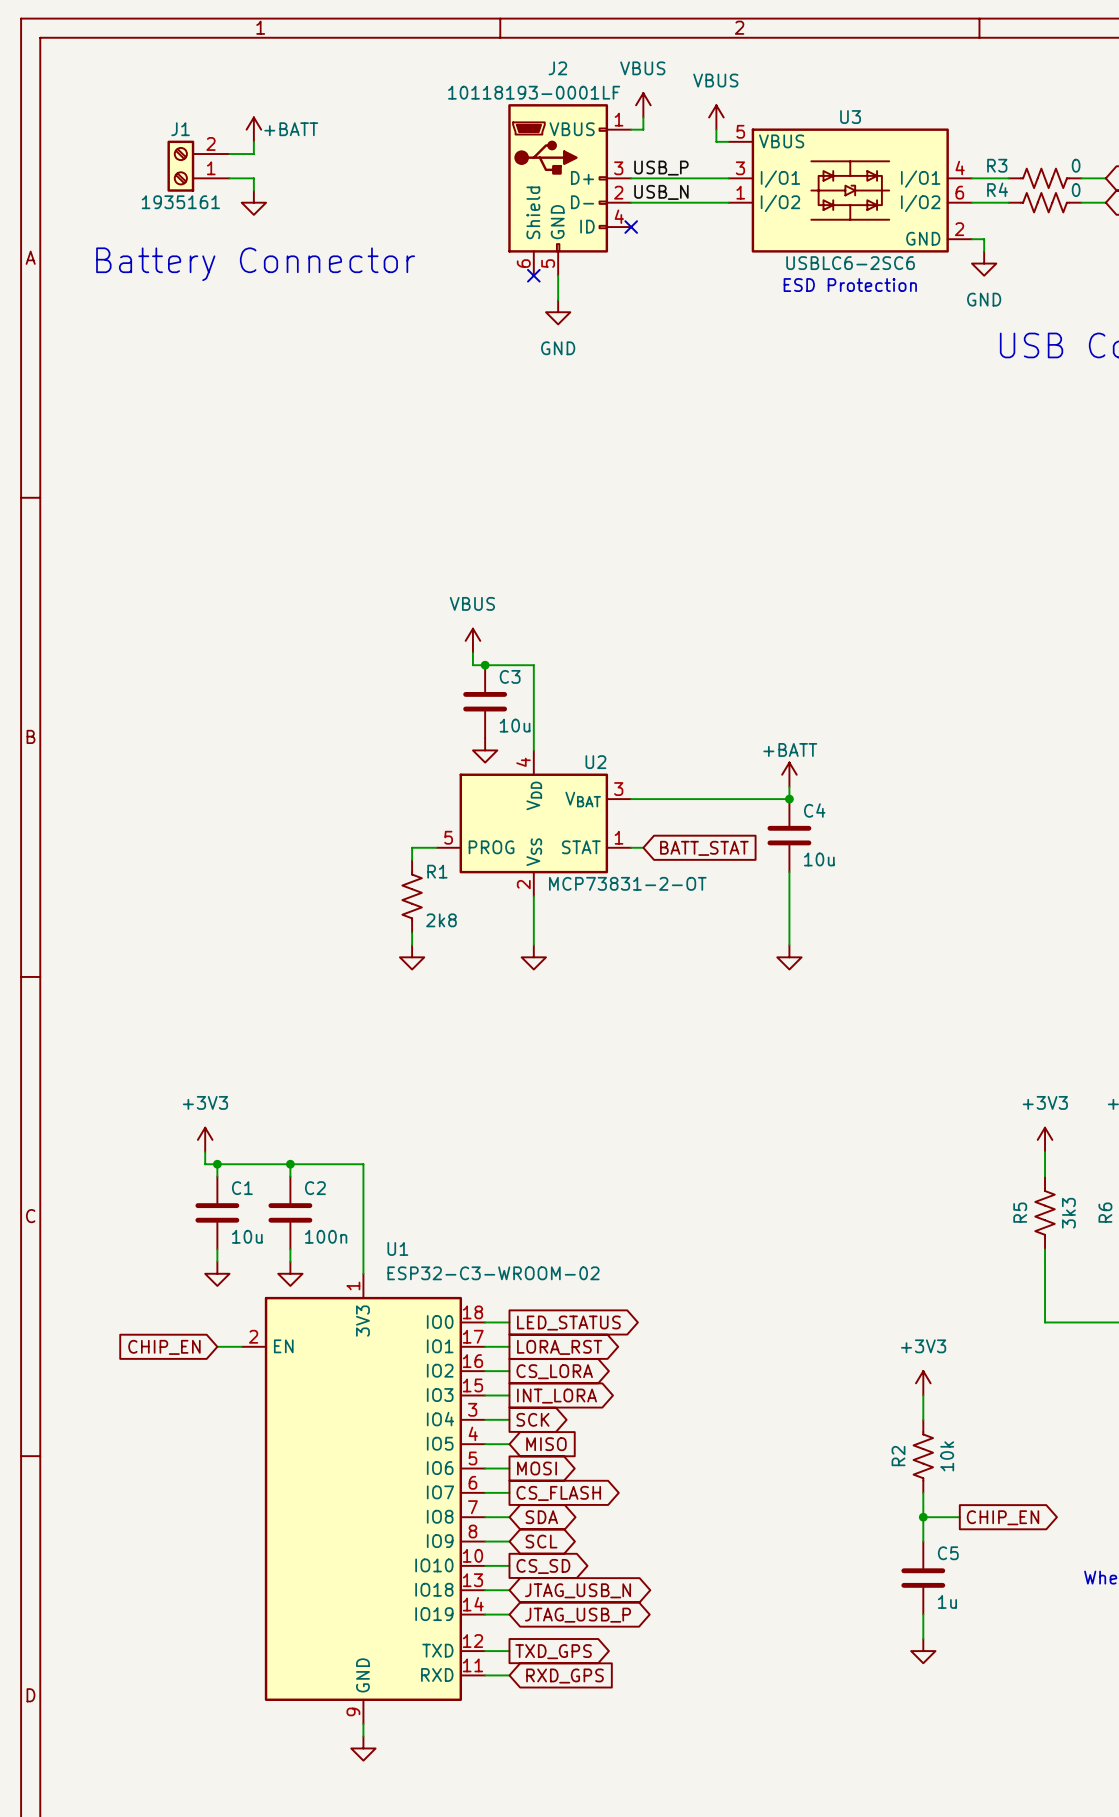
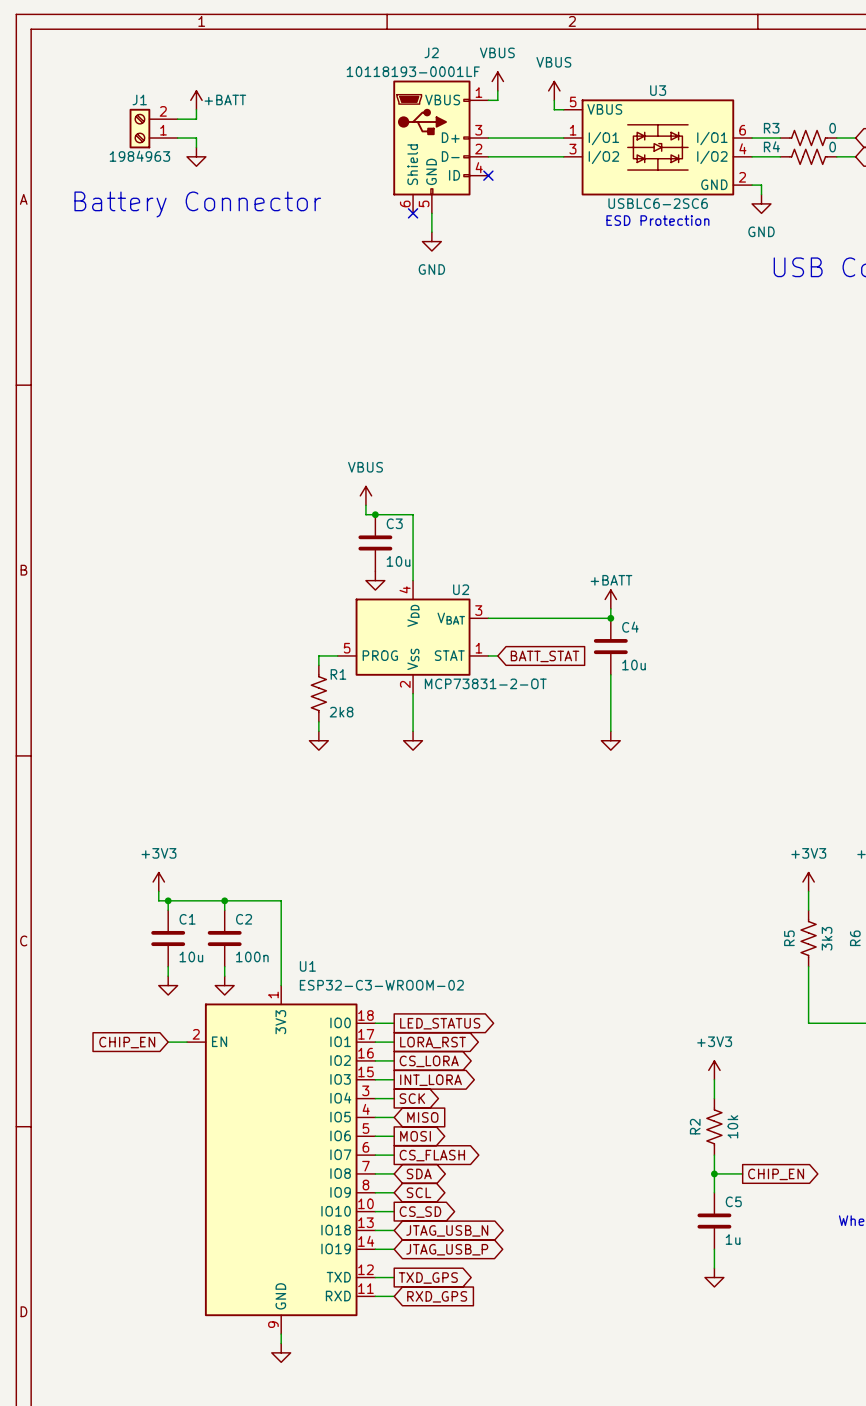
label: USB_P (661, 168) -> none
U3 pin number: 3 (740, 168) -> 1 (573, 130)
U3 pin number: 4 (960, 168) -> 6 (742, 130)
label: USB_N (661, 192) -> none
U3 pin number: 1 (740, 192) -> 3 (572, 149)
U3 pin number: 6 (959, 192) -> 4 (742, 148)
J1 value: 1935161 (180, 202) -> 1984963 (139, 156)

